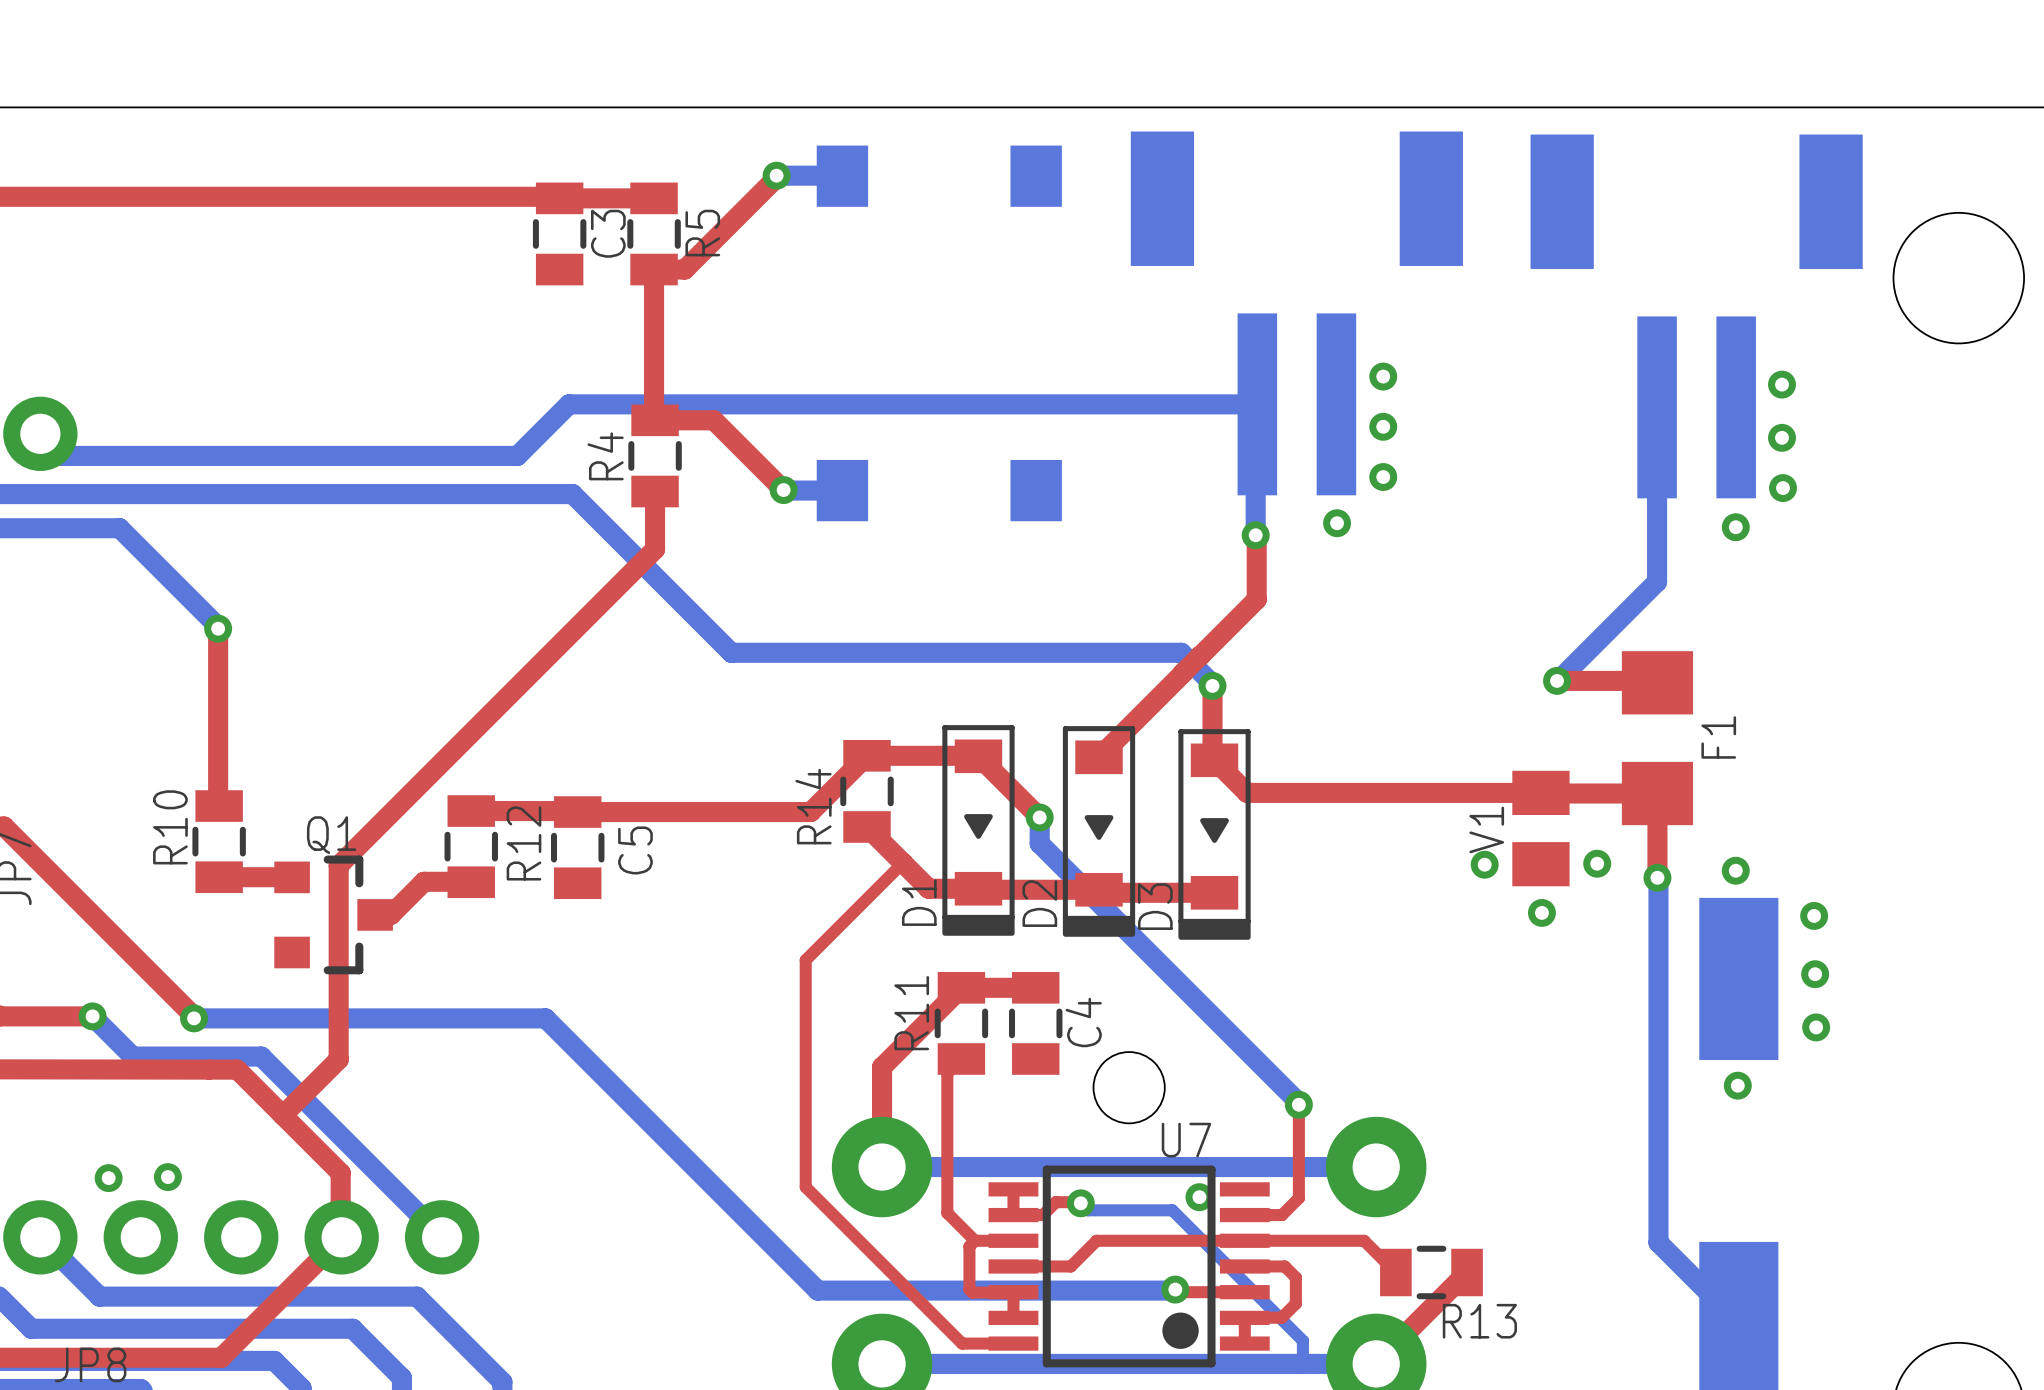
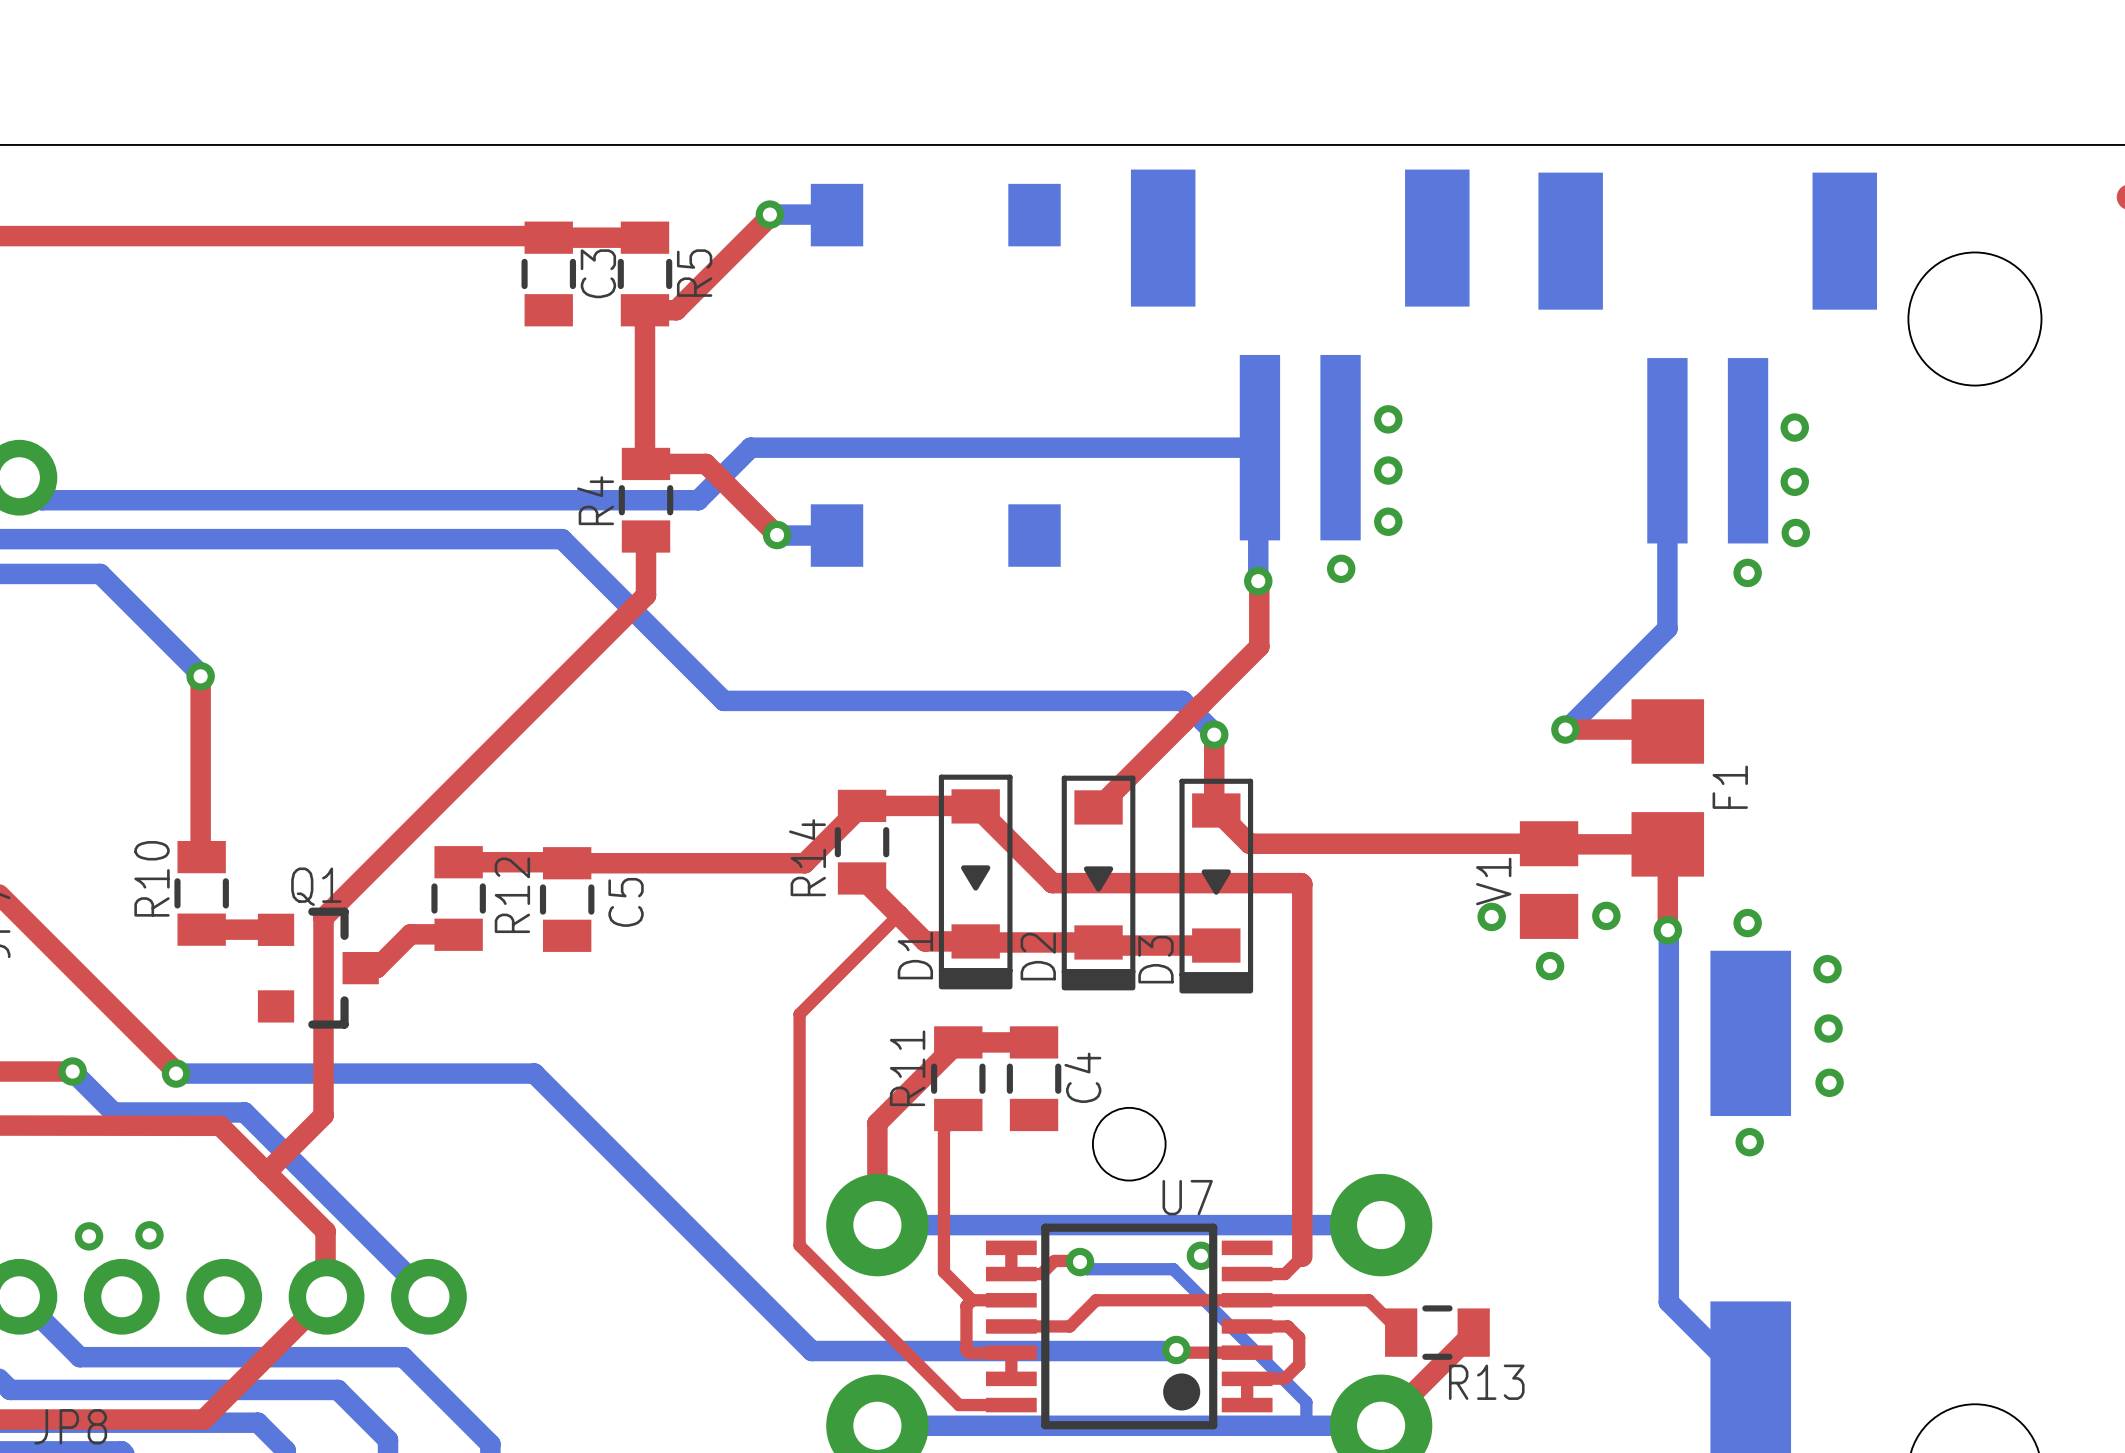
bottom track: (757, 404) (569, 404) (517, 455) -> (750, 447) (698, 500) (505, 500)
top track: none -> (1038, 868) (1052, 883) (1302, 884) (1302, 1161)
bottom track: (1039, 817) (1039, 843) (1298, 1104) -> none
via: (1039, 817) -> none
top track width: thin (1298, 1104) (1298, 1198) -> thick (1302, 1161) (1302, 1256)
via: (1298, 1104) -> none

